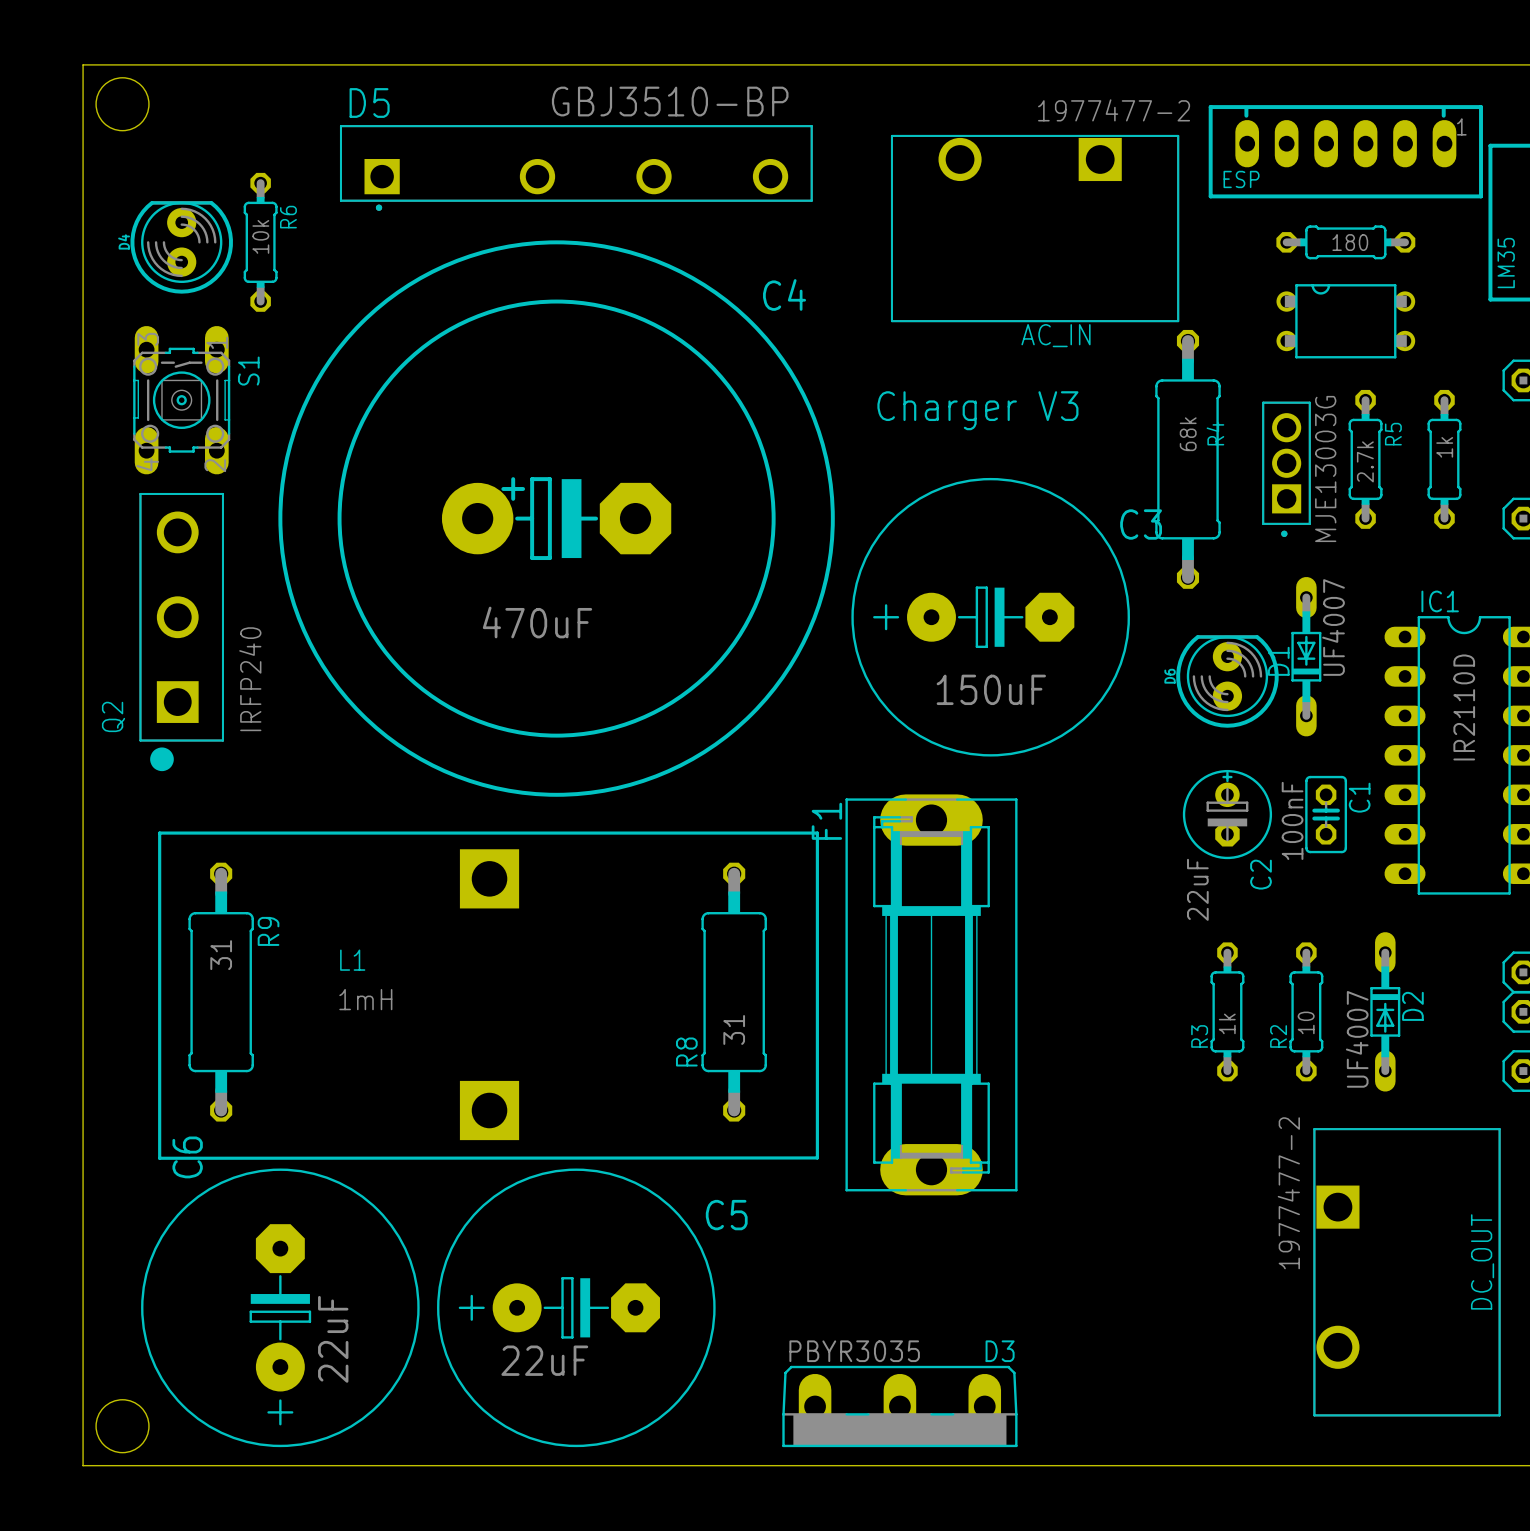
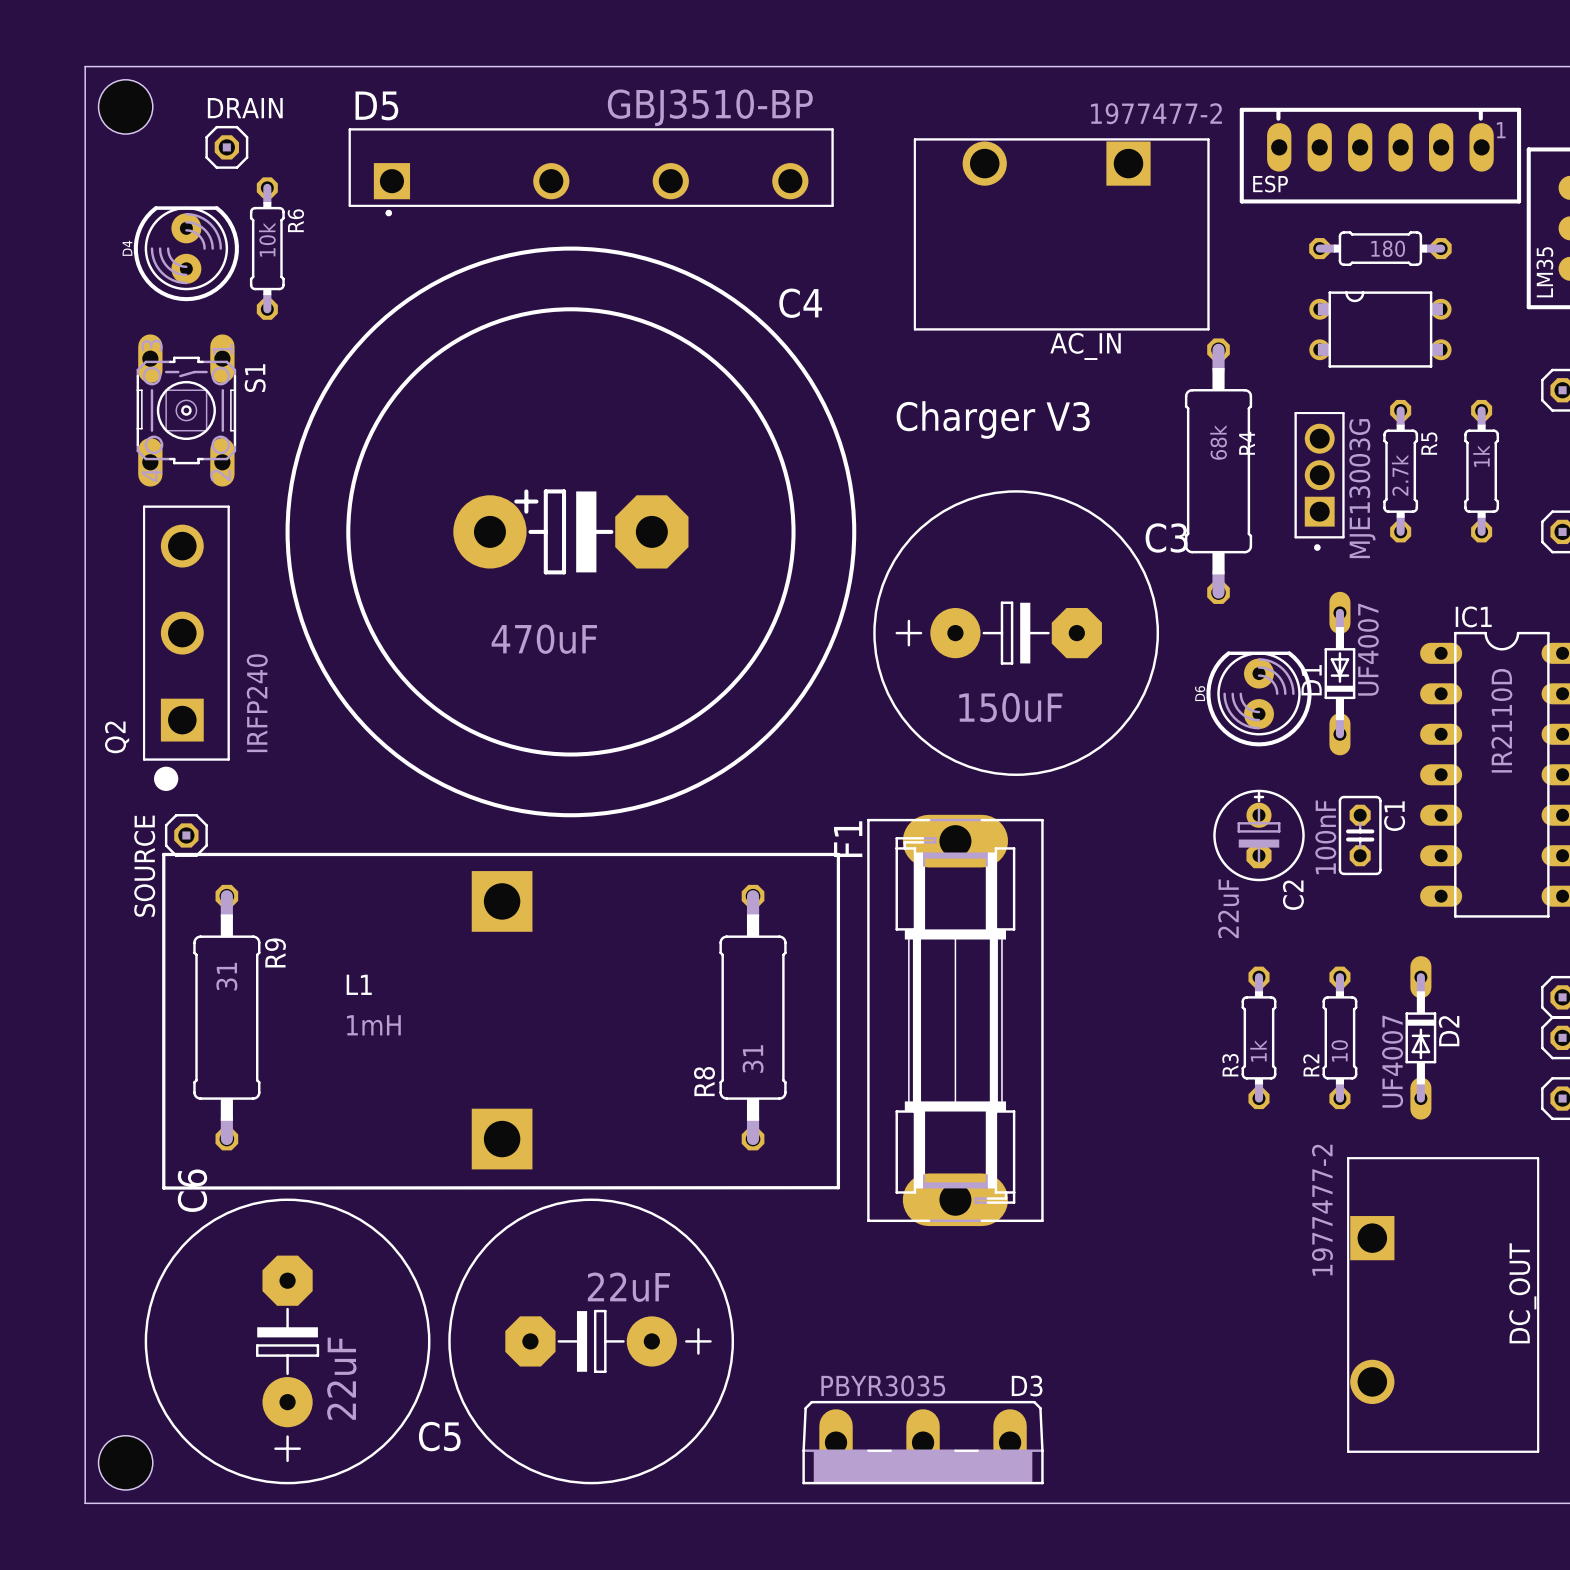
DRAIN: none -> (226, 147)
SOURCE: none -> (186, 835)
C5 rotation: 0° (576, 1307) -> 180° (591, 1341)

